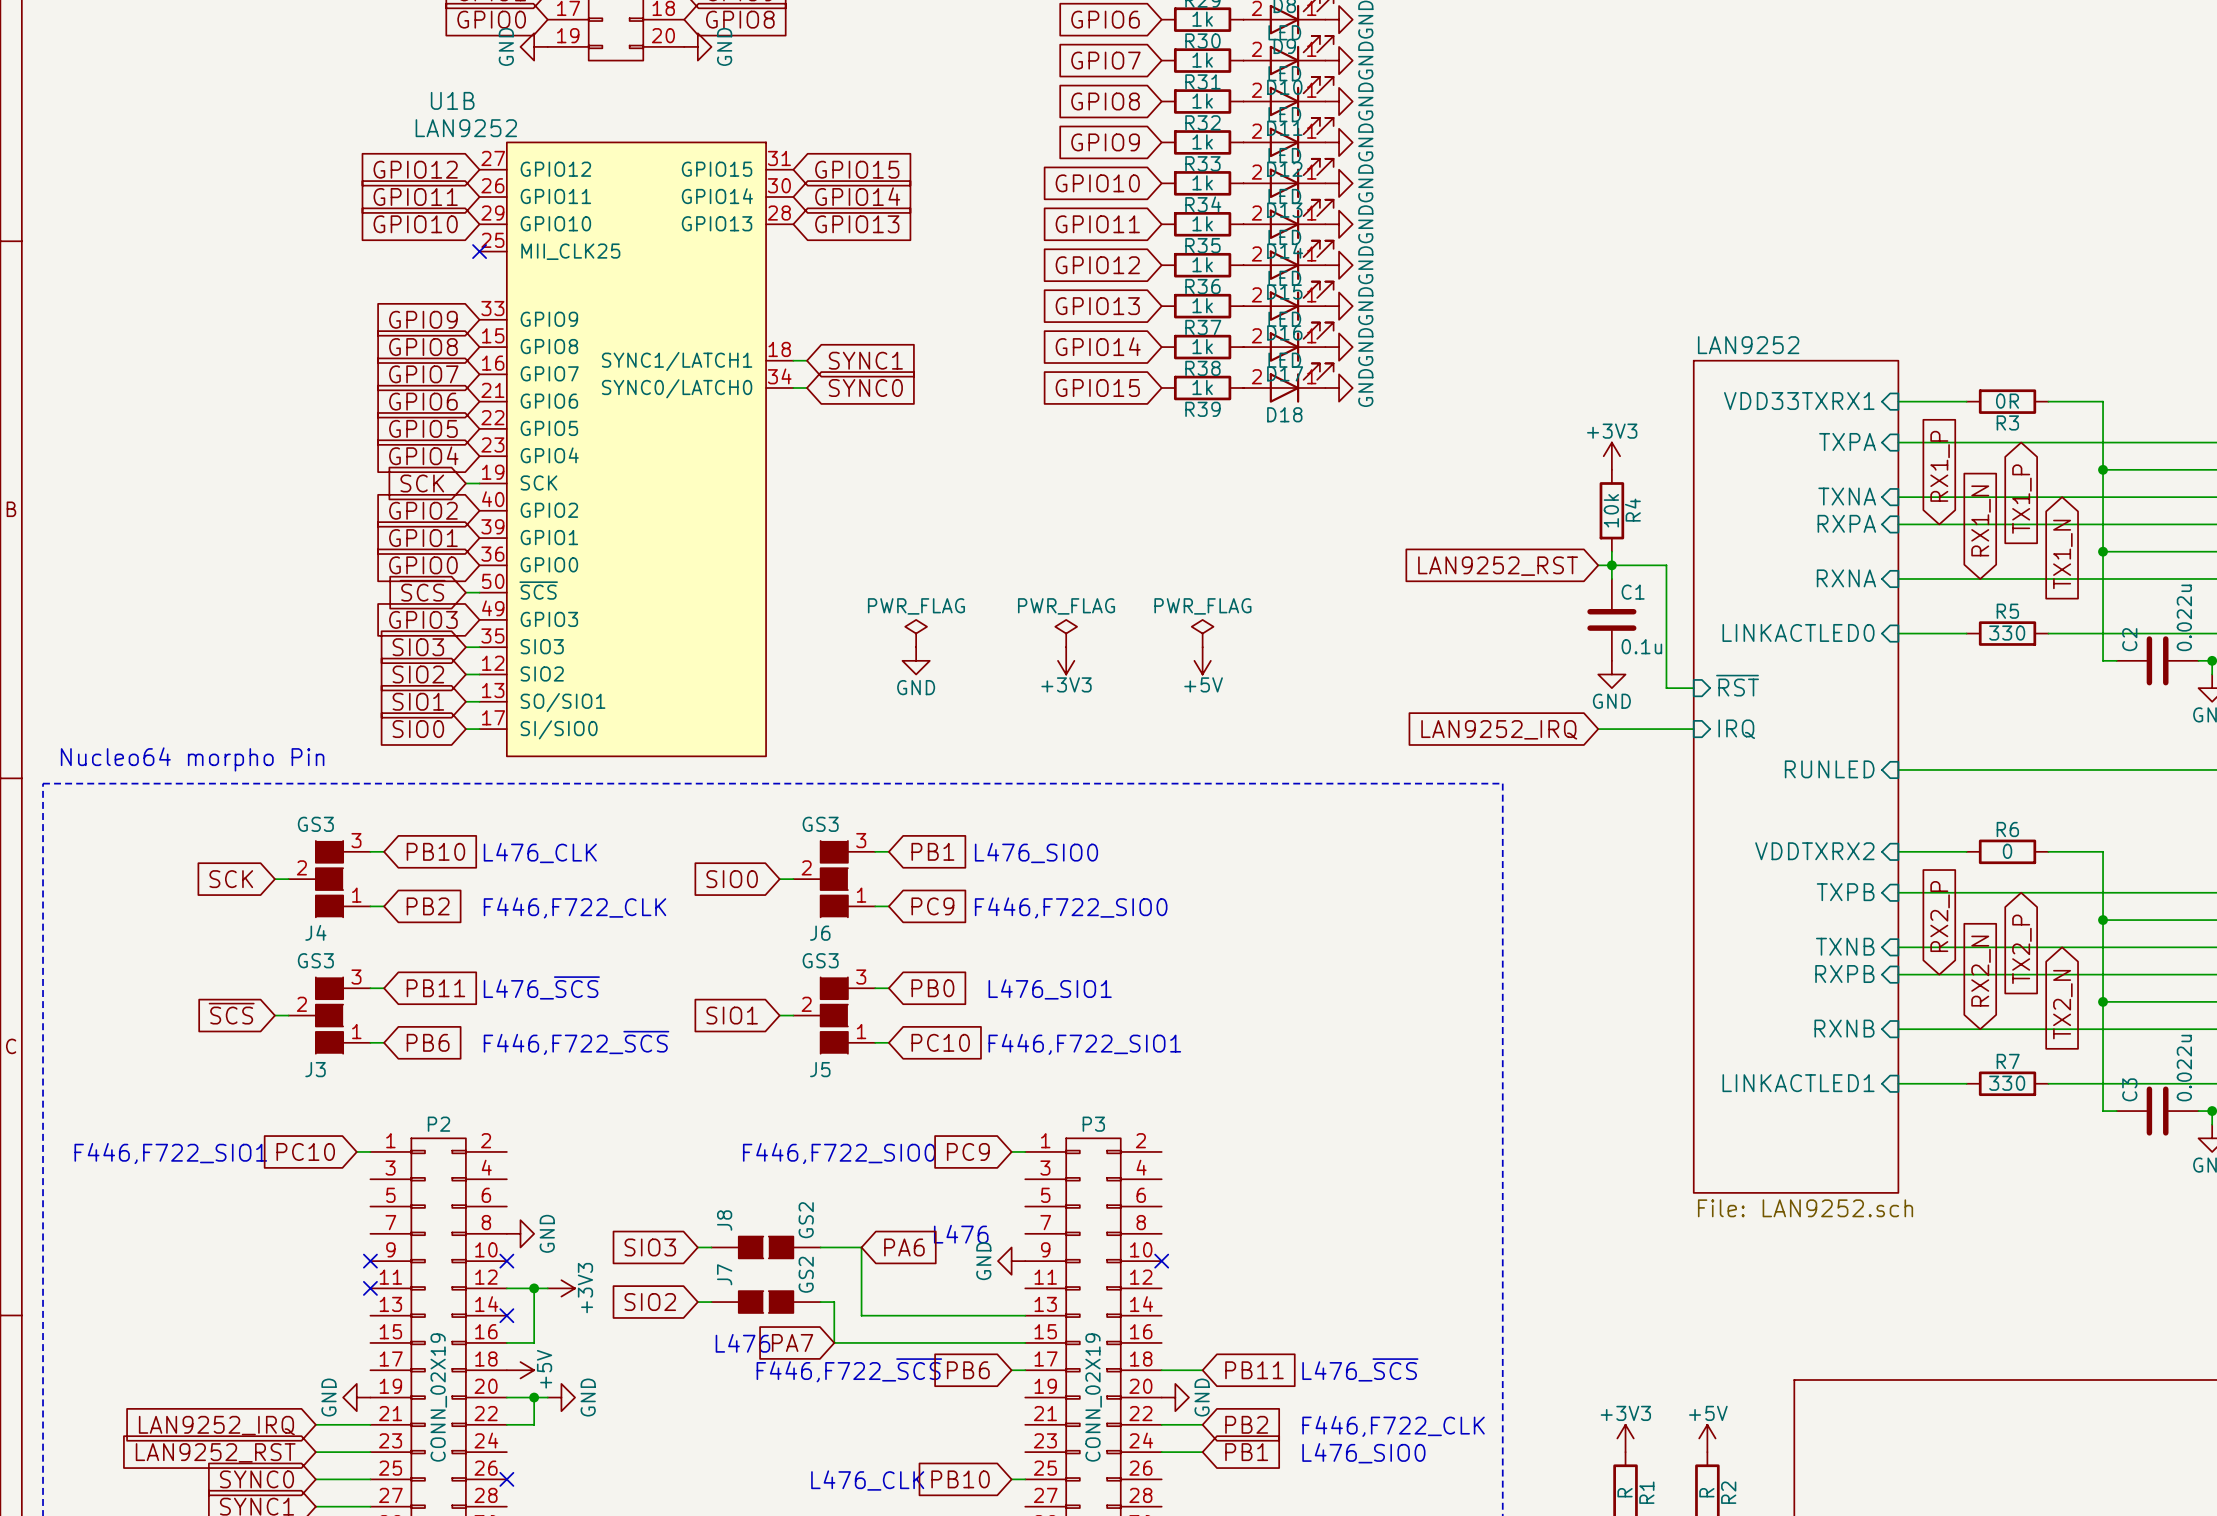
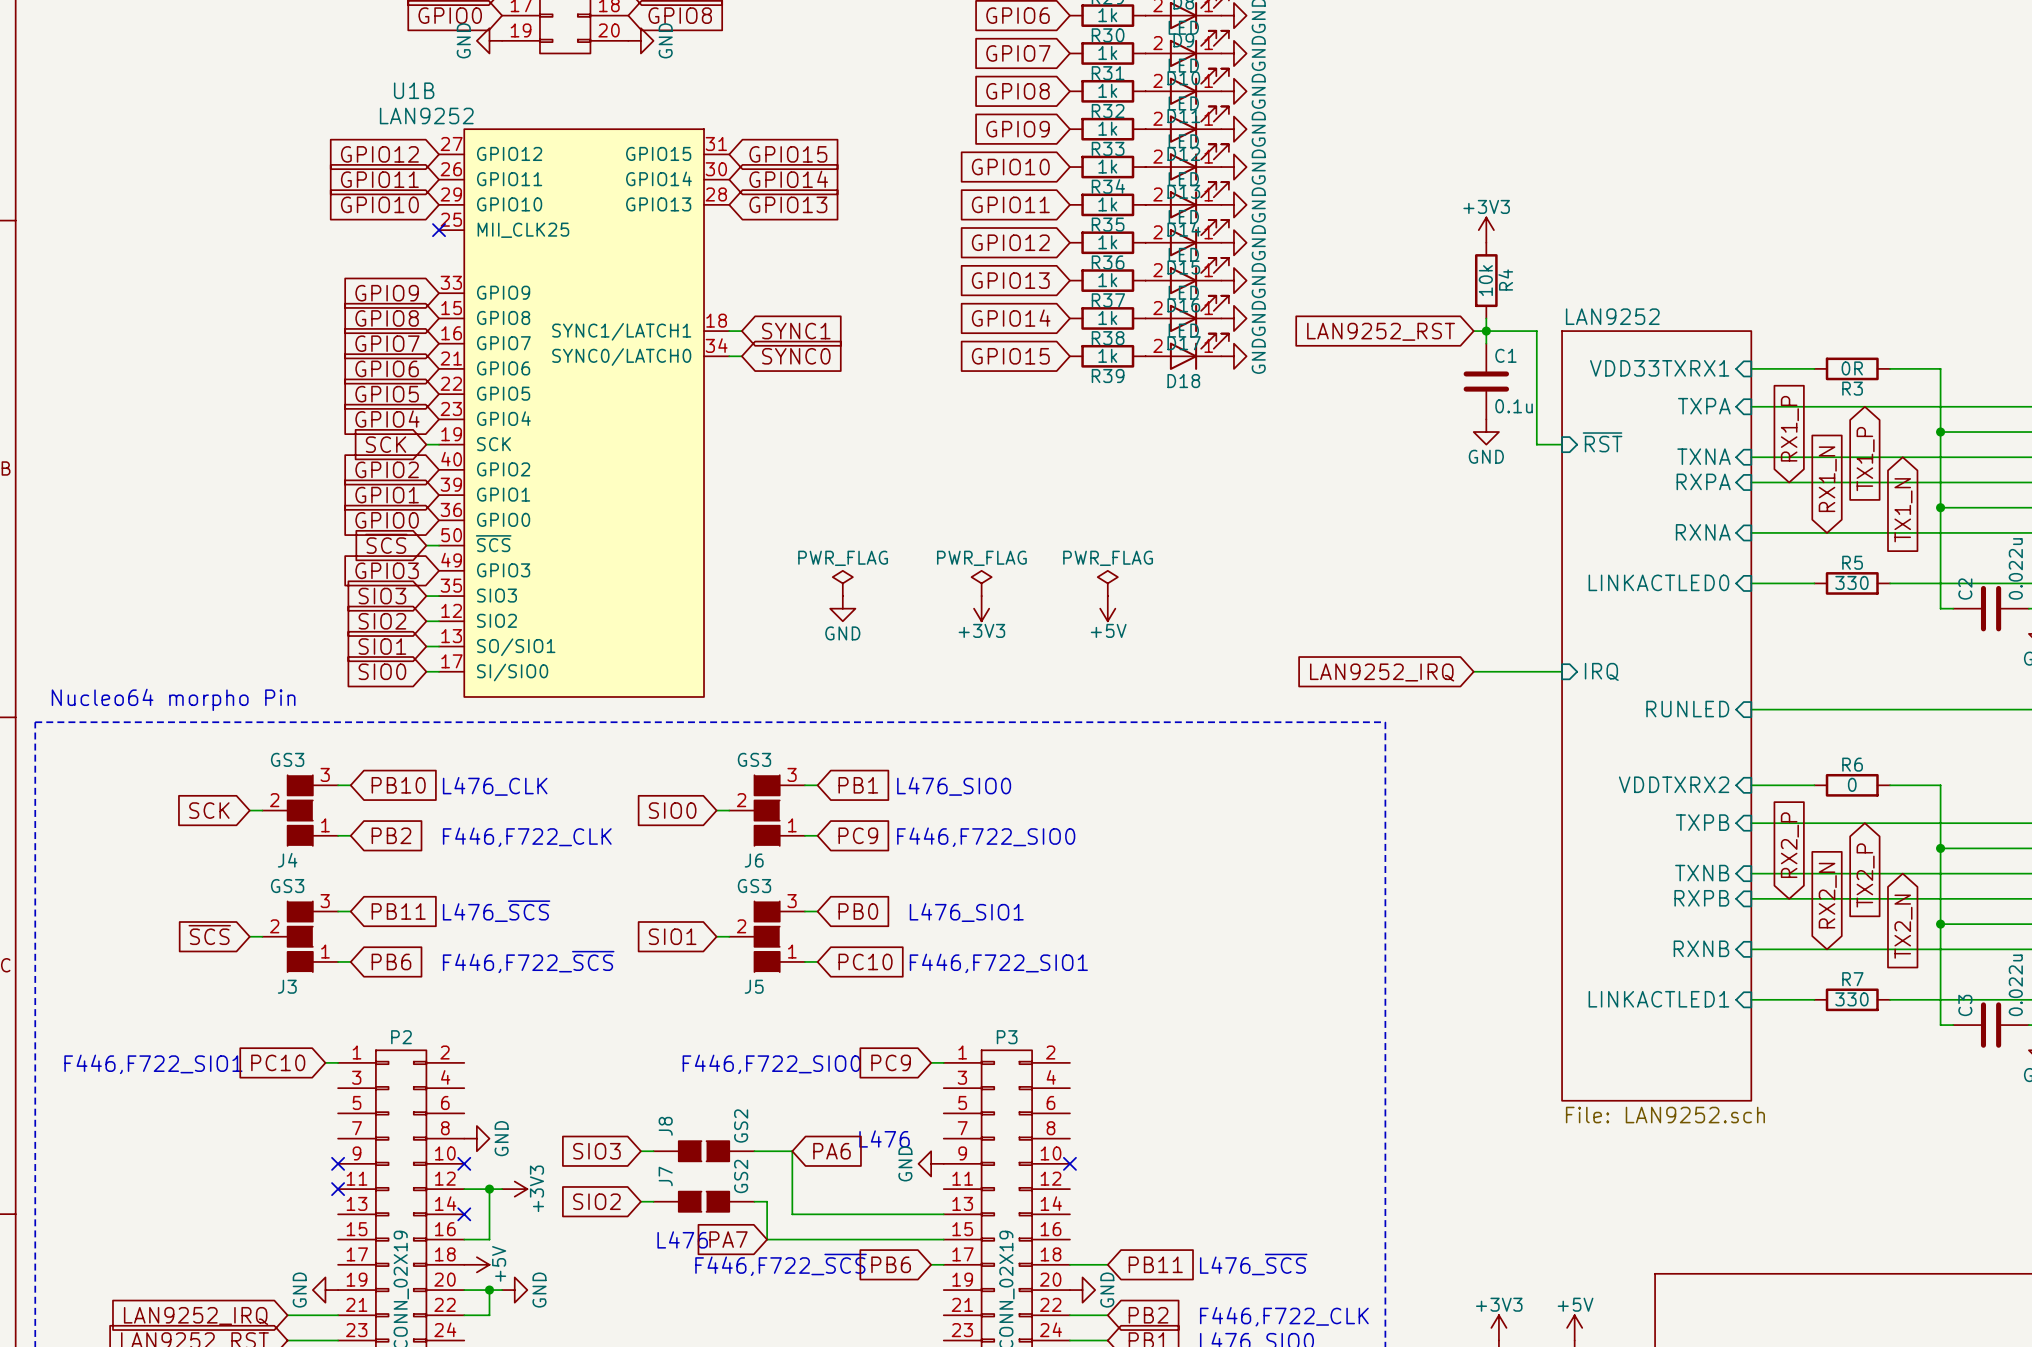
junction: none -> (1486, 331)
power symbol position: +3V3 (1611, 456) -> +3V3 (1486, 230)
R4 position: (1611, 510) -> (1486, 280)
wire: (1611, 551) (1611, 578) -> (1486, 318) (1486, 343)
wire: (1598, 565) (1666, 565) (1666, 688) (1693, 688) -> (1473, 331) (1536, 331) (1536, 444) (1562, 444)
junction: (1611, 565) -> none
global label position: LAN9252_RST (1498, 566) -> LAN9252_RST (1381, 331)
C1 position: (1611, 619) -> (1486, 381)
power symbol position: GND (1611, 674) -> GND (1486, 432)
sheet pin position: ~{RST} (1737, 685) -> ~{RST} (1602, 442)

